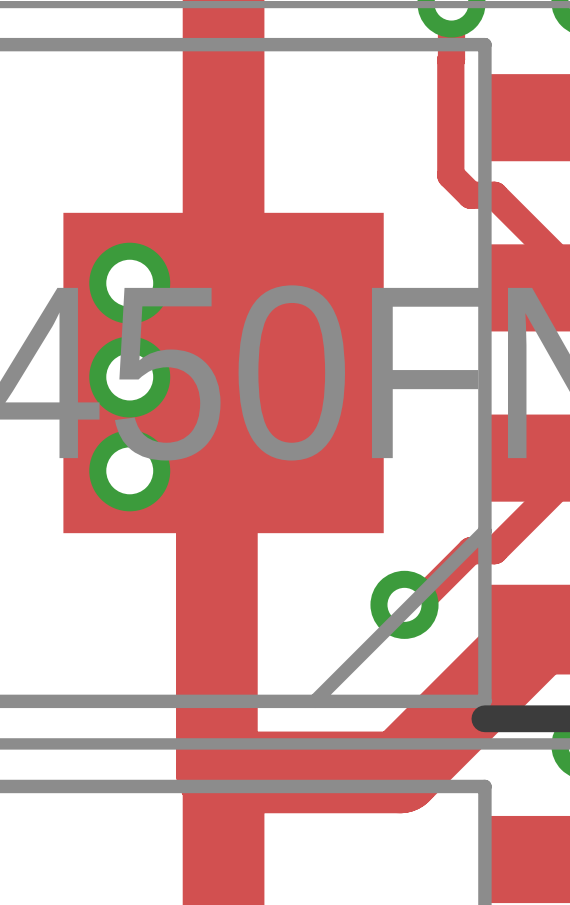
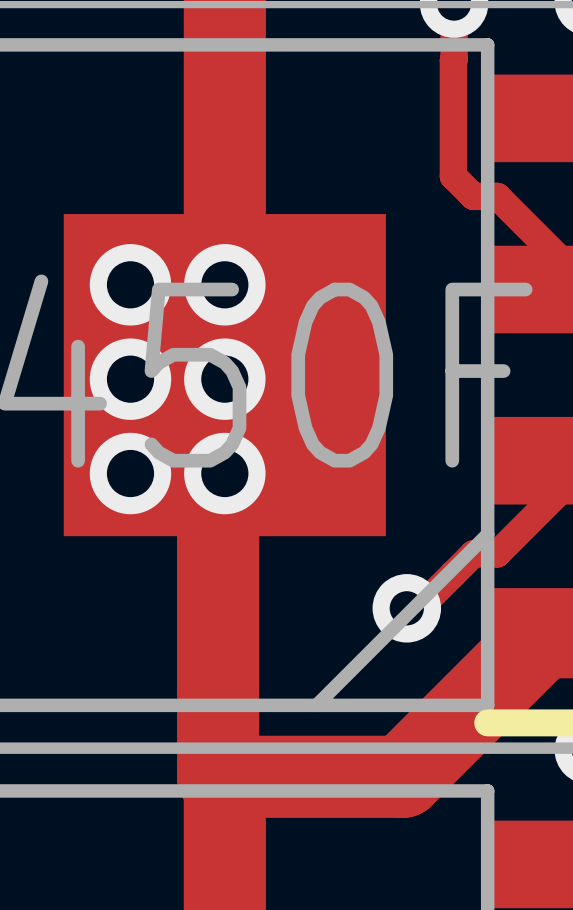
via: none -> (224, 284)
via: none -> (224, 379)
via: none -> (224, 473)

